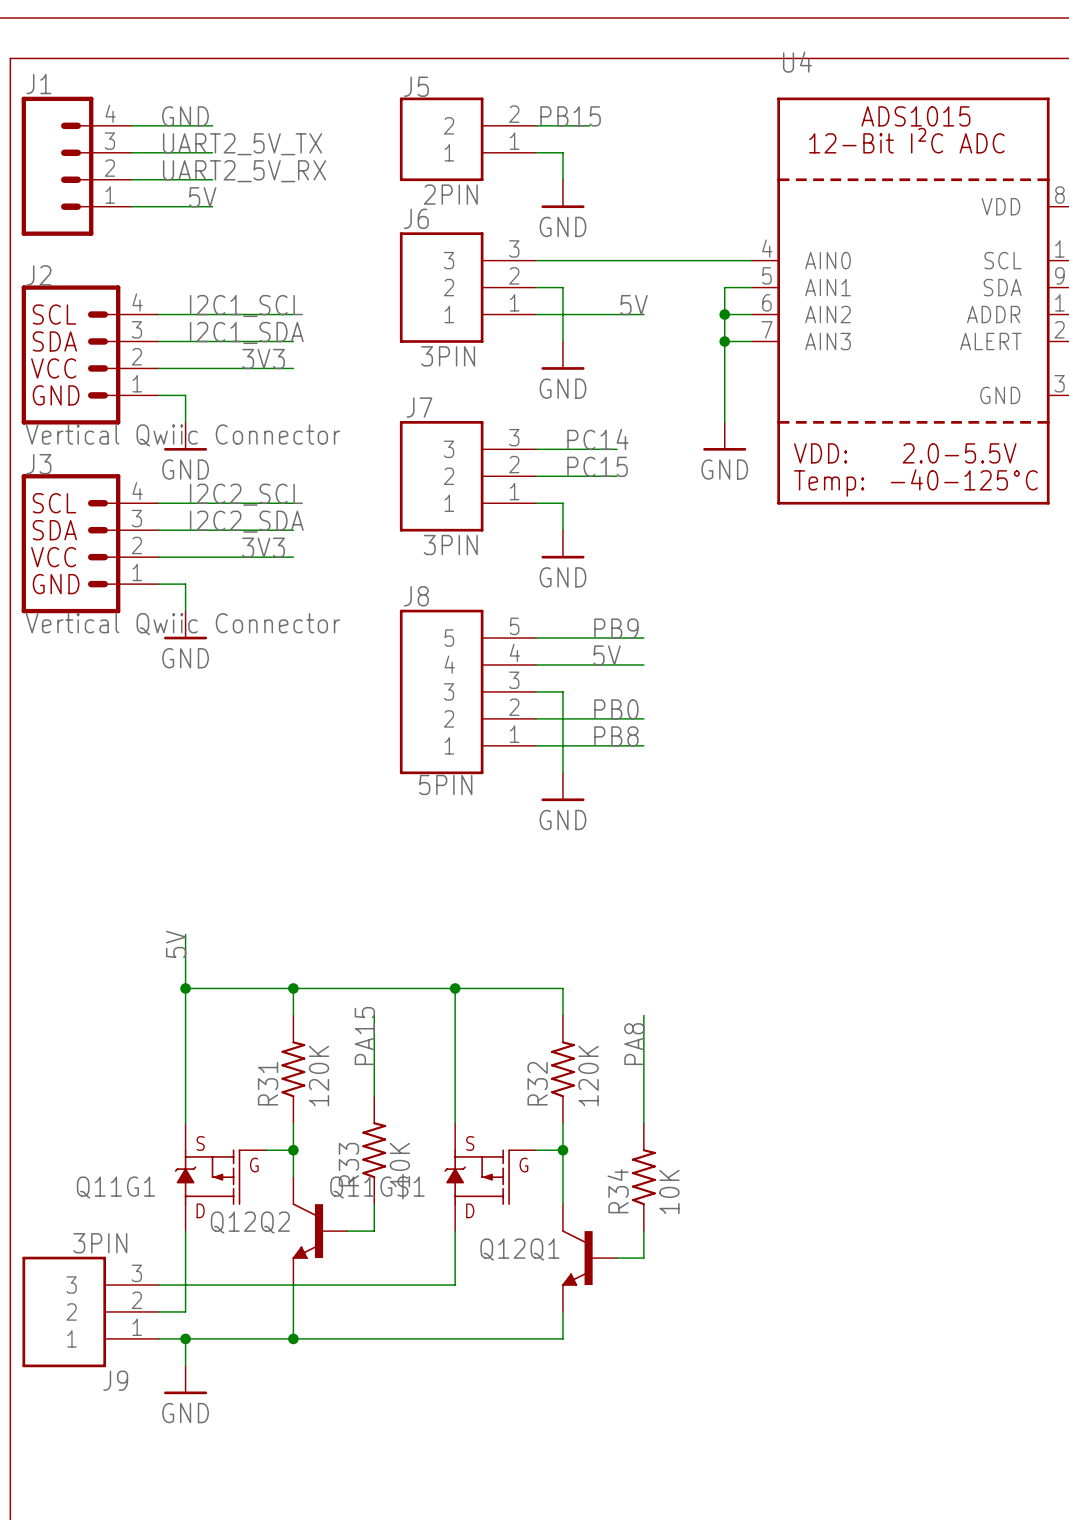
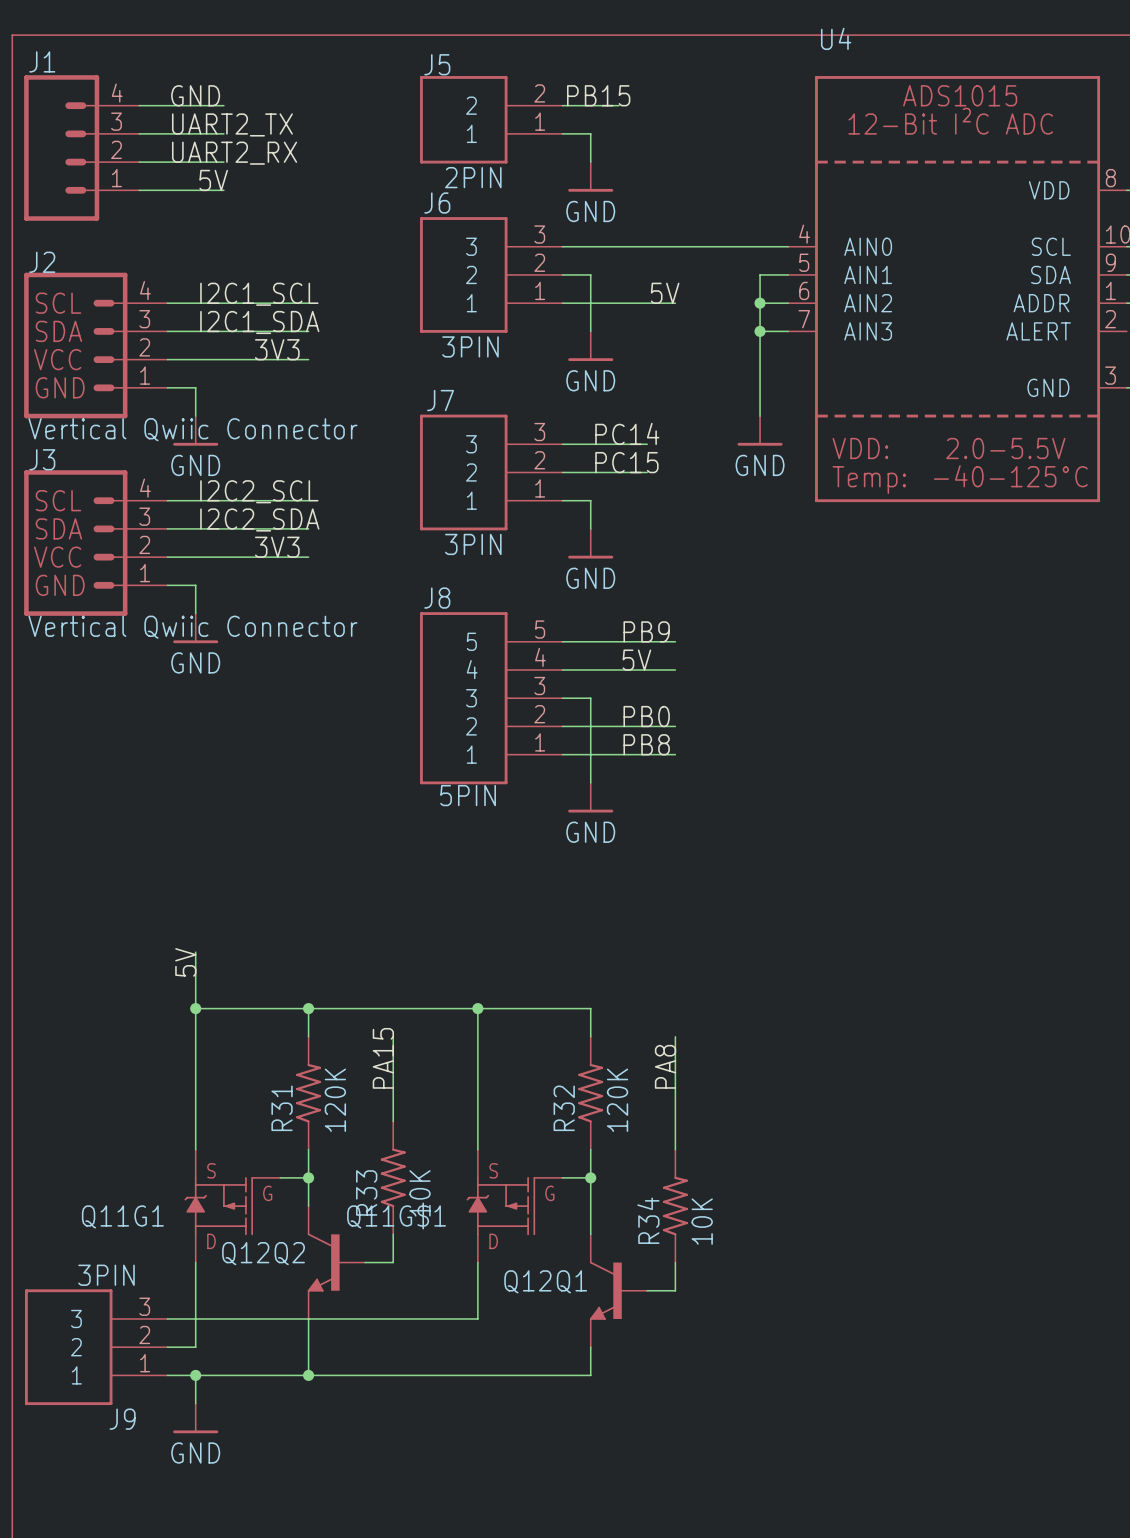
label: UART2_5V_TX (242, 144) -> UART2_TX (232, 124)
label: UART2_5V_RX (244, 171) -> UART2_RX (234, 153)

